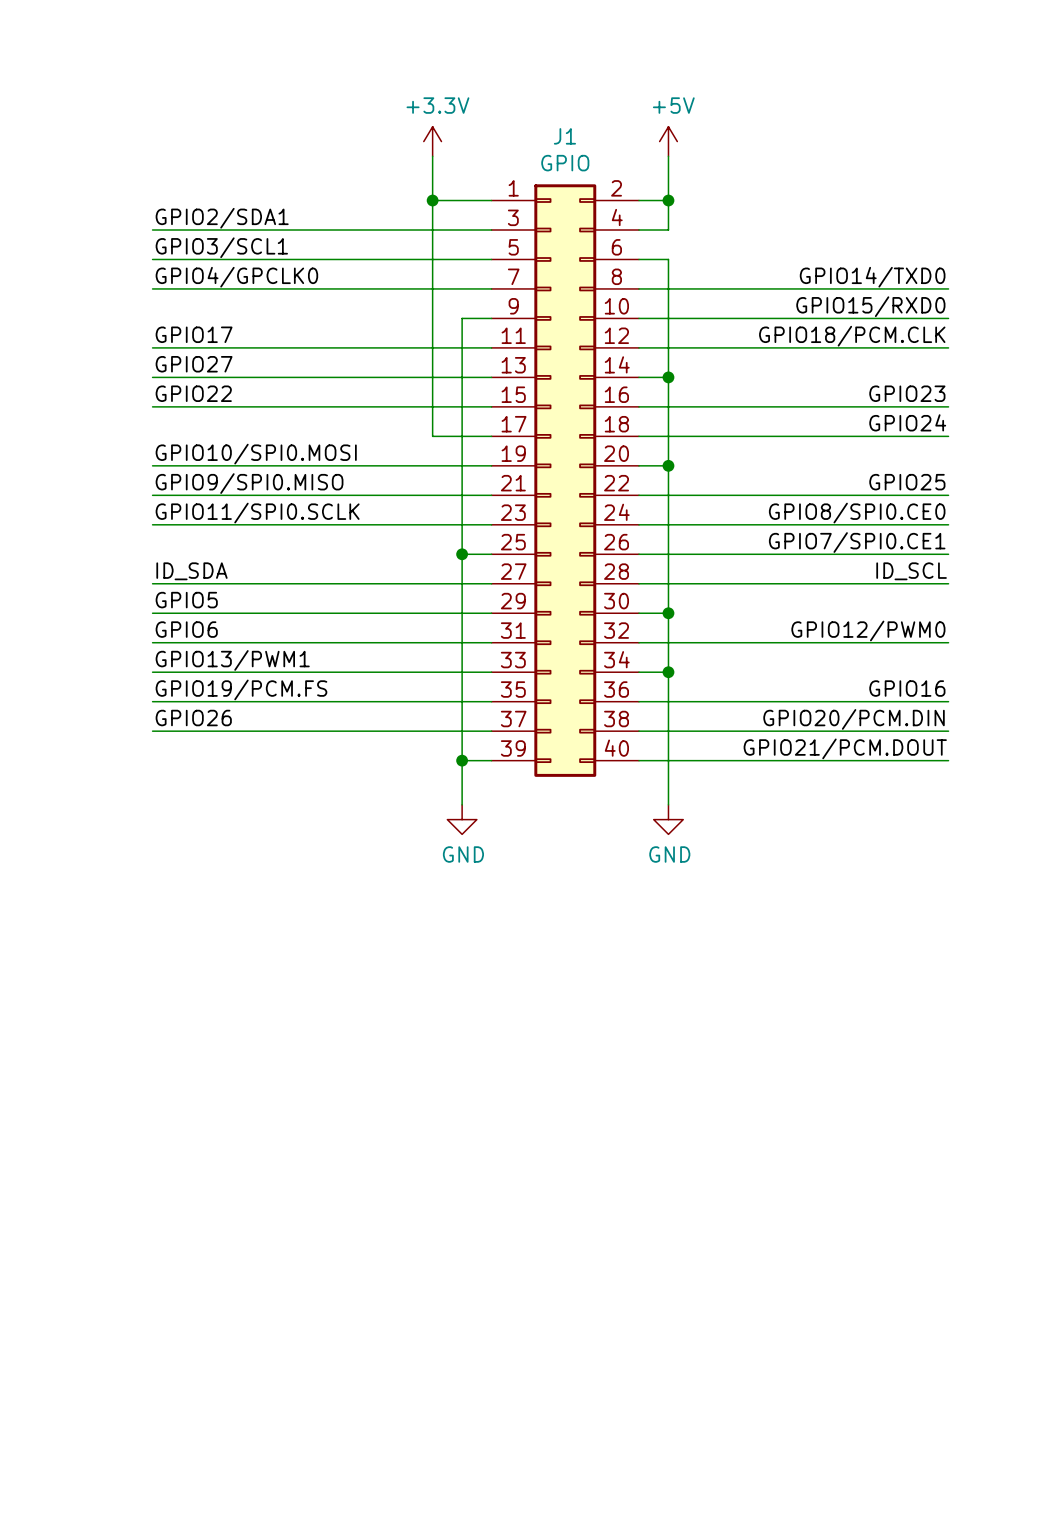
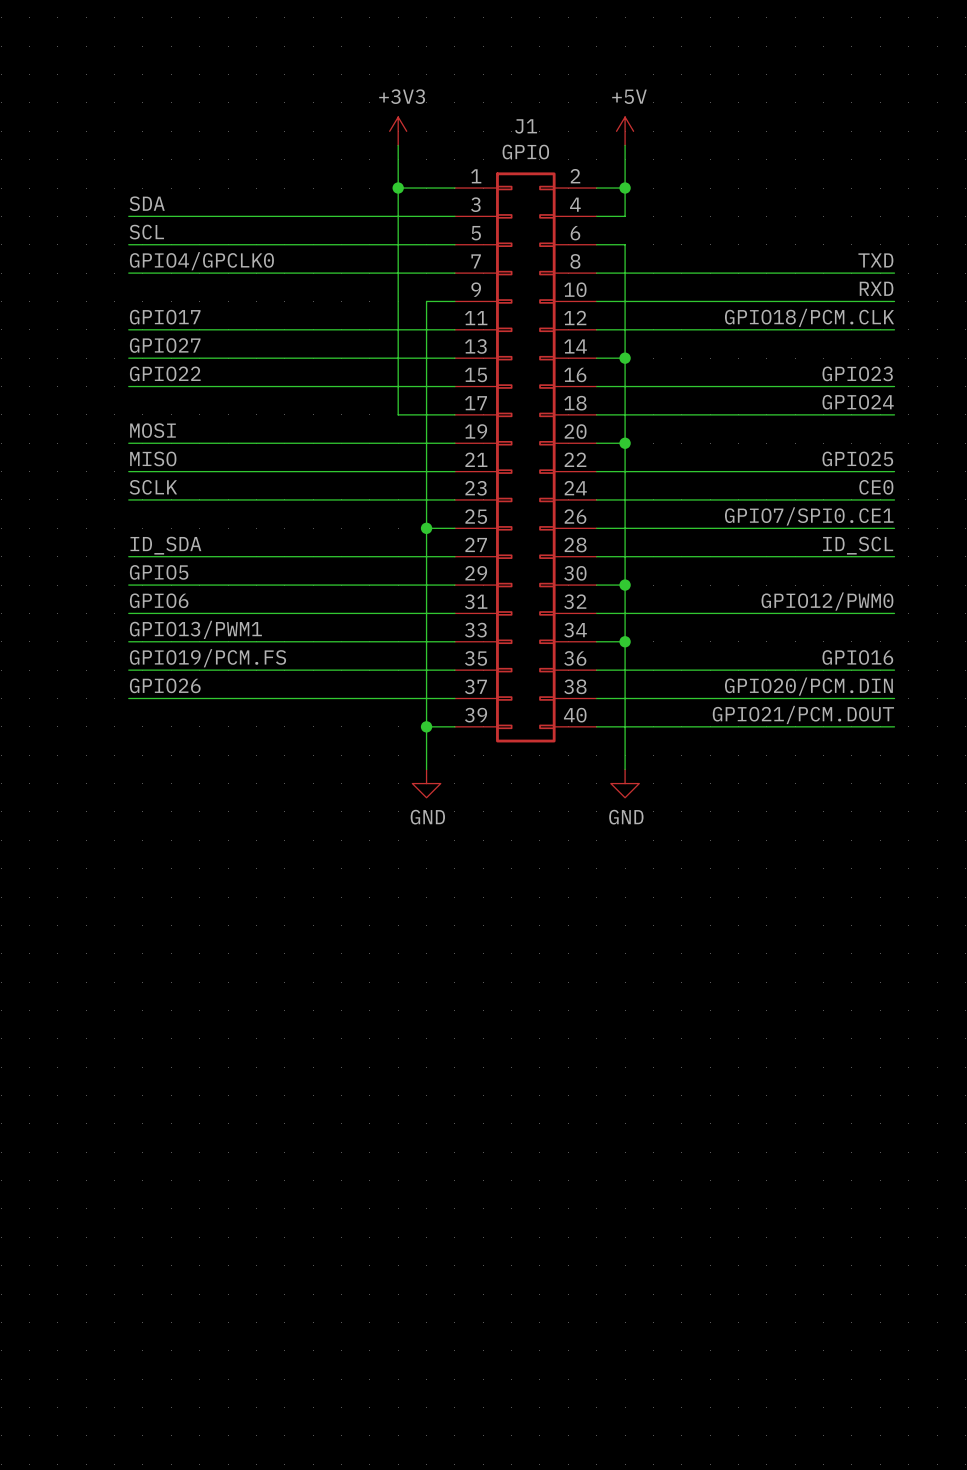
power symbol: +3.3V (432, 141) -> +3V3 (398, 131)
label: GPIO2/SDA1 (222, 218) -> SDA (147, 203)
label: GPIO3/SCL1 (221, 247) -> SCL (146, 232)
label: GPIO14/TXD0 (872, 277) -> TXD (875, 260)
label: GPIO15/RXD0 (870, 306) -> RXD (876, 288)
label: GPIO10/SPI0.MOSI (256, 454) -> MOSI (152, 430)
label: GPIO9/SPI0.MISO (249, 483) -> MISO (153, 458)
label: GPIO11/SPI0.SCLK (257, 513) -> SCLK (153, 487)
label: GPIO8/SPI0.CE0 (857, 513) -> CE0 (876, 487)

